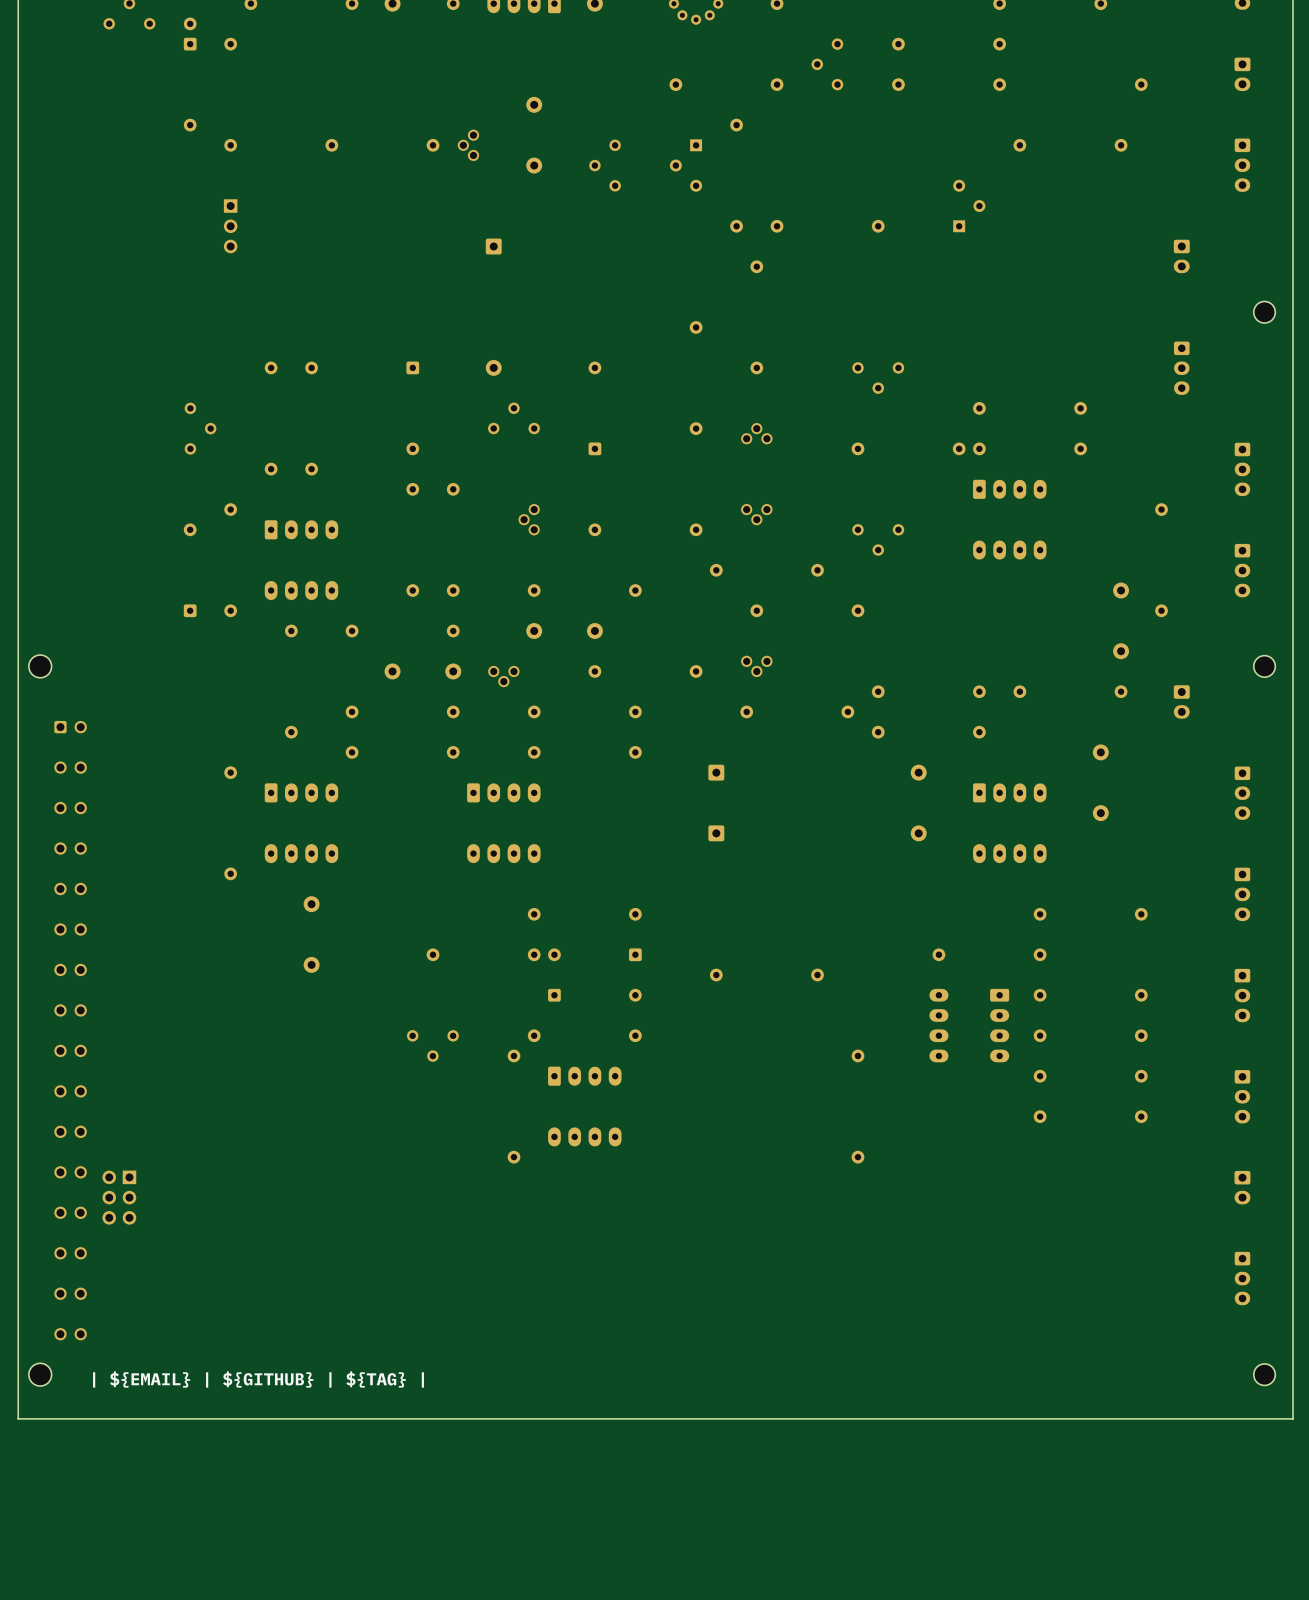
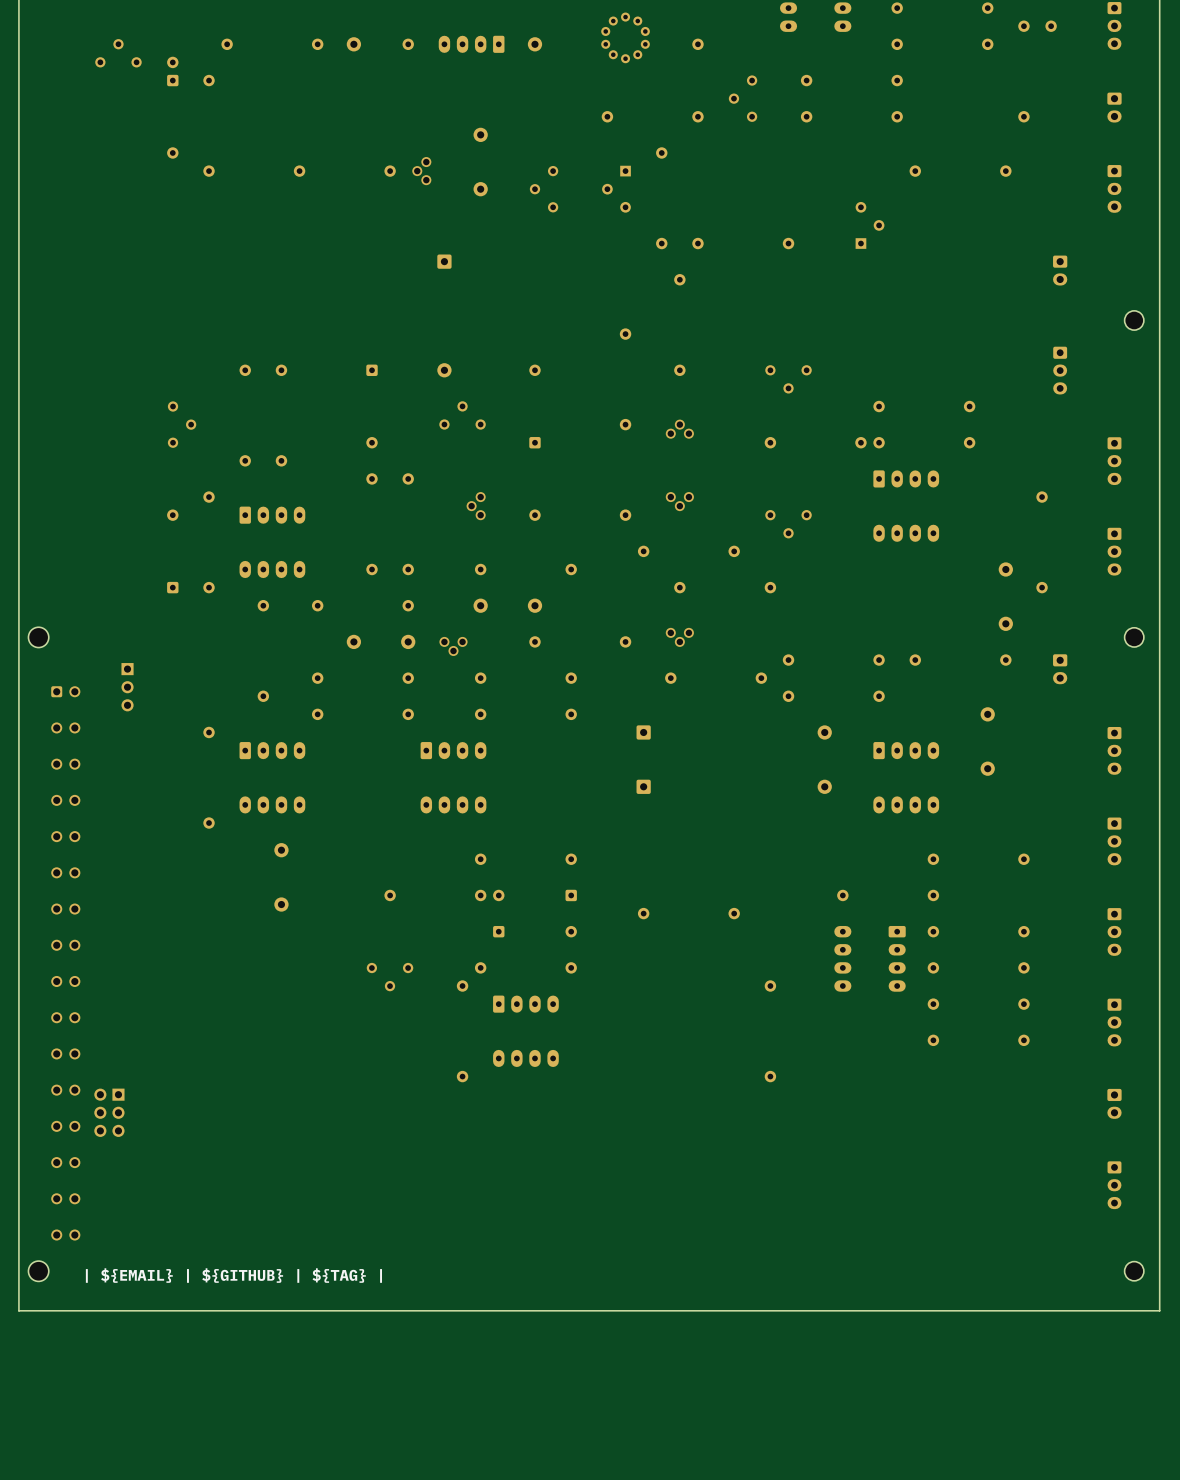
part: (230, 226) -> none
part: none -> (127, 687)

